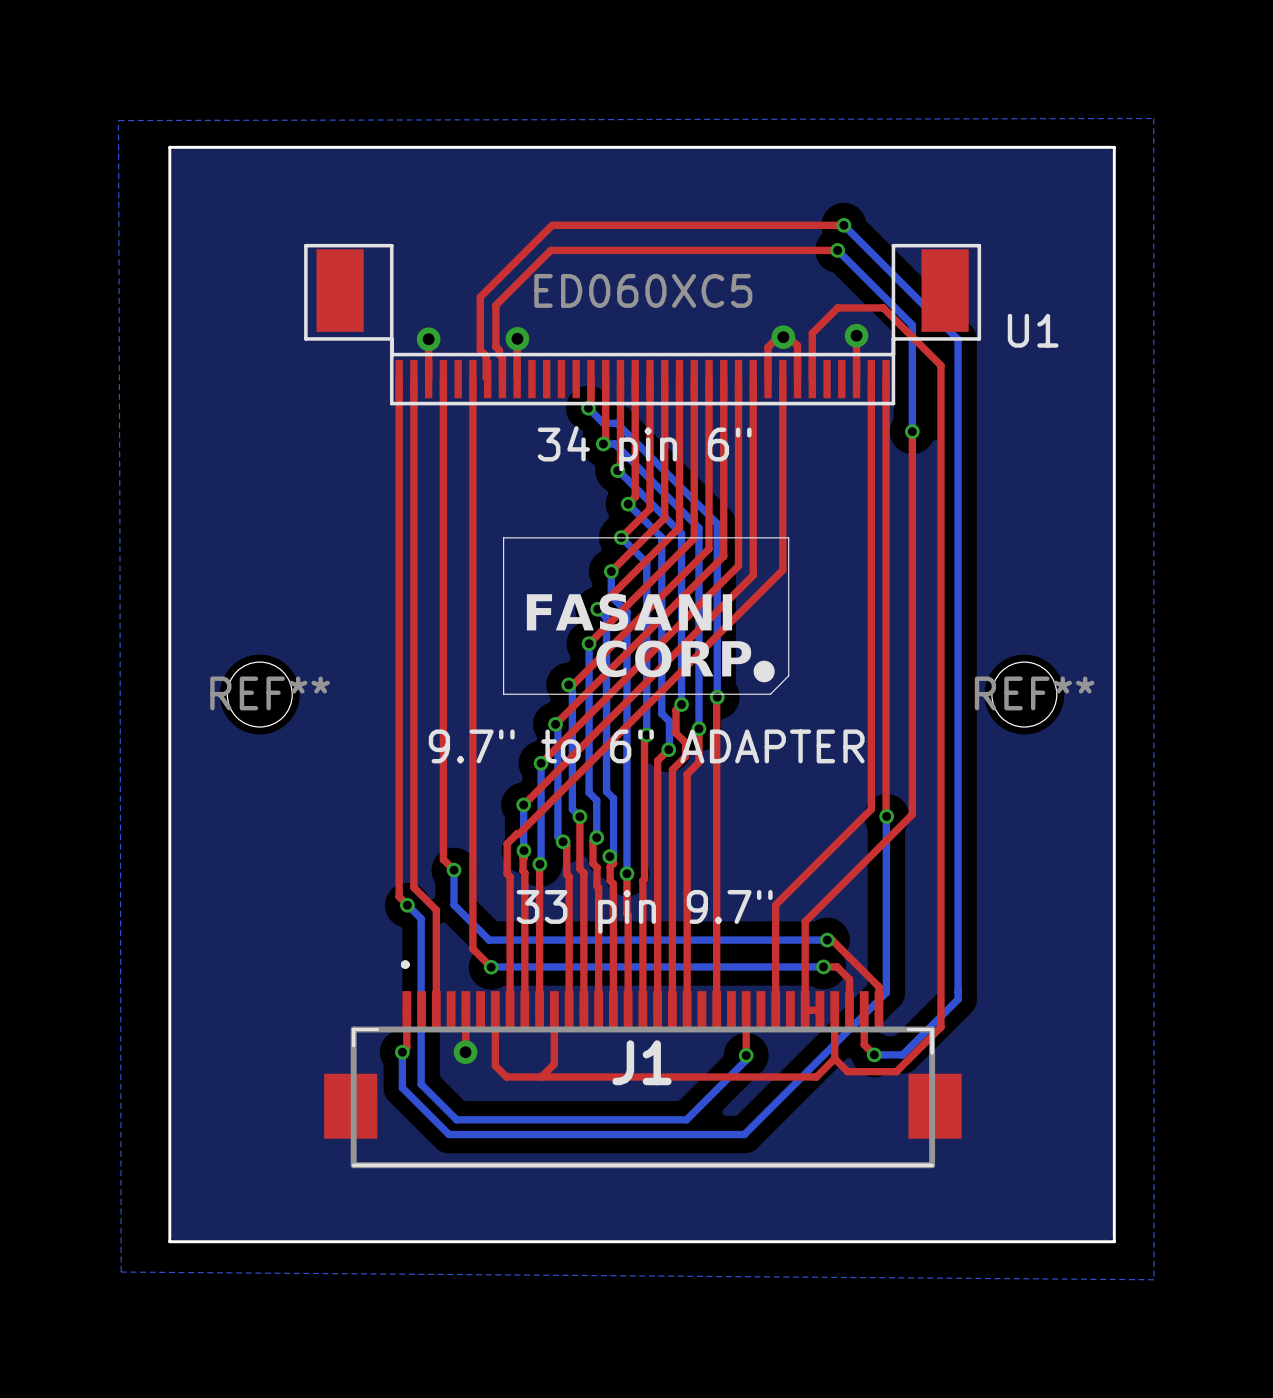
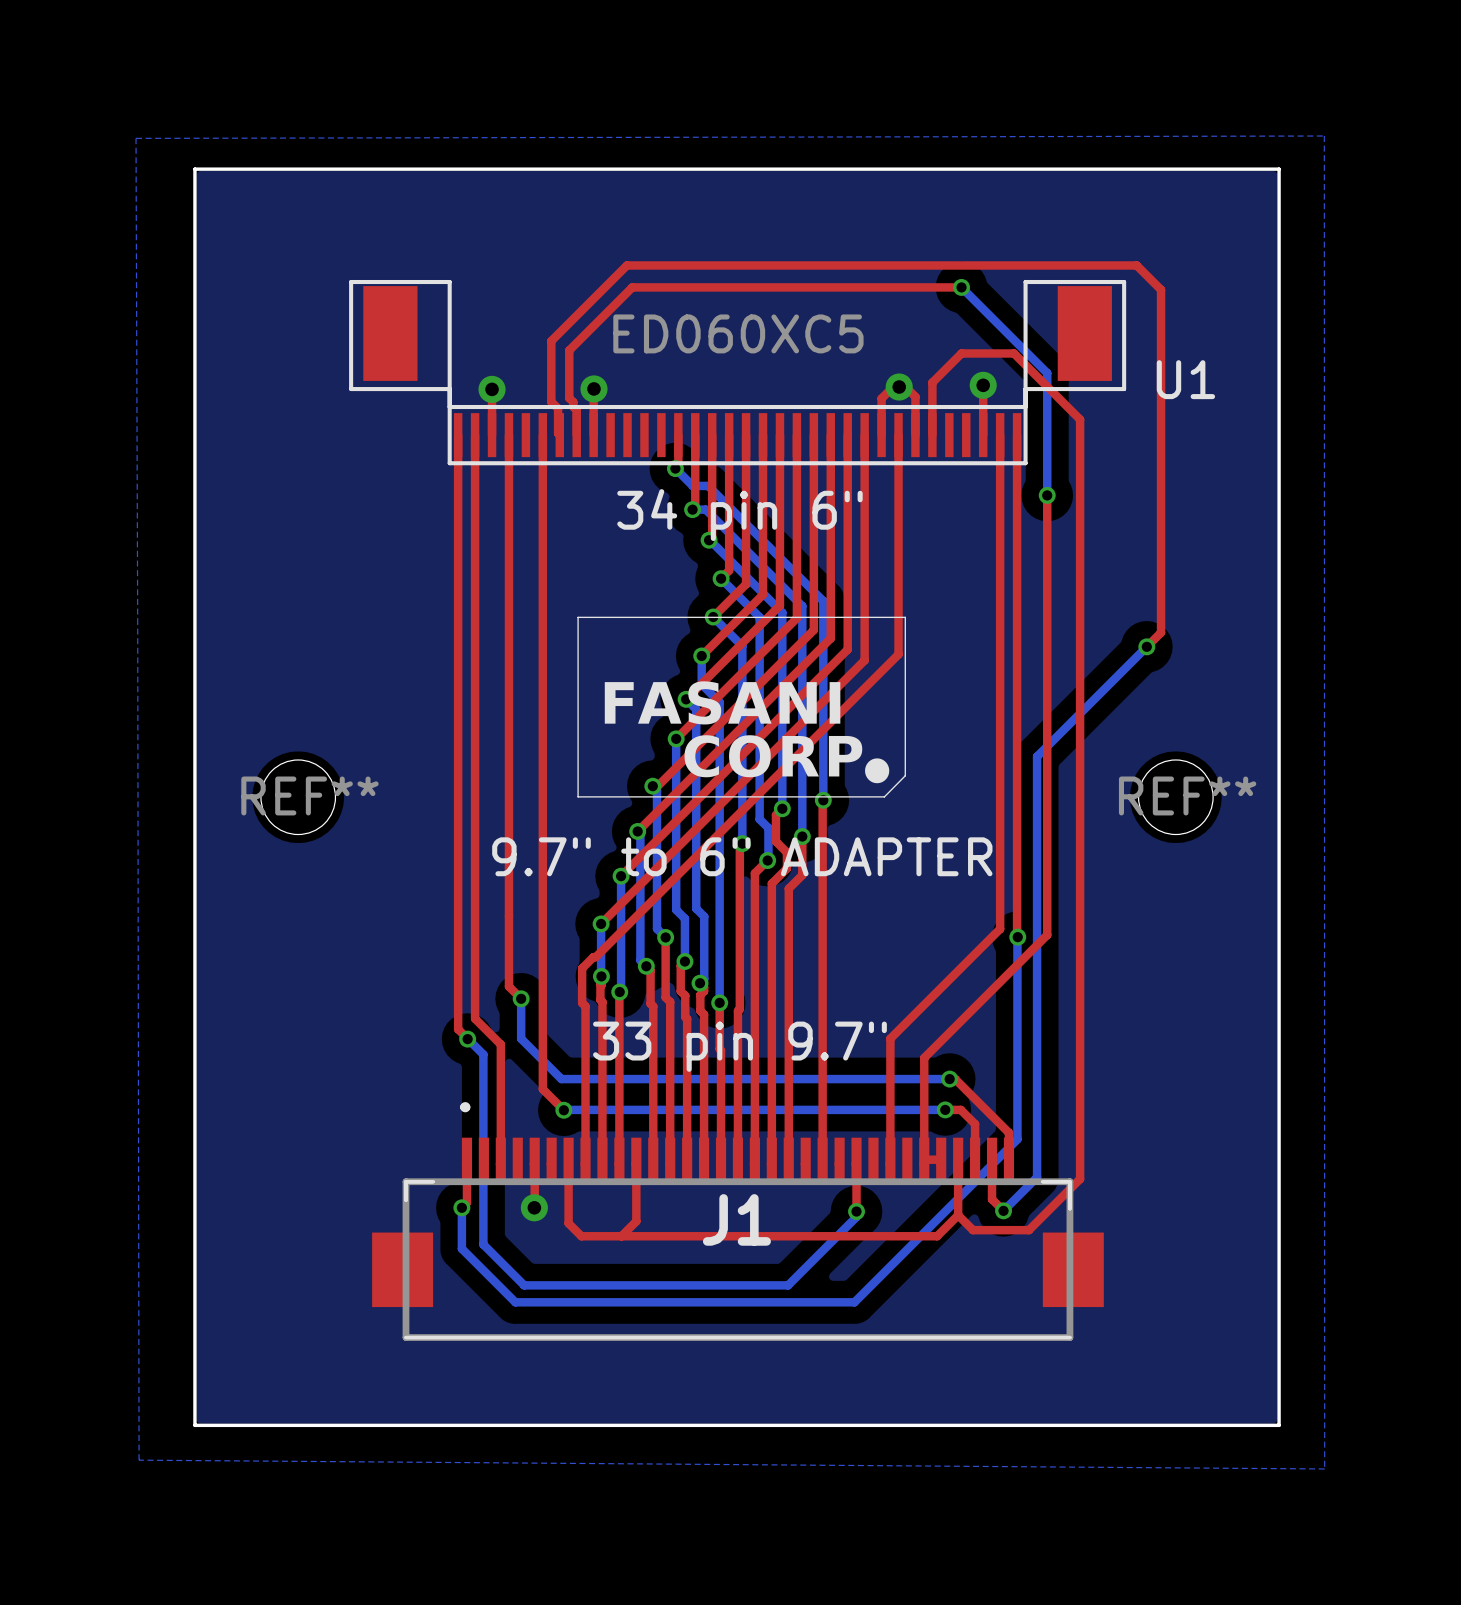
top track: (843, 225) (552, 225) (546, 231) -> (1146, 646) (1161, 632) (1161, 289) (1136, 265) (626, 265)
bottom track: (843, 225) (958, 339) (958, 999) (902, 1054) (874, 1054) -> (1146, 646) (1037, 756) (1037, 1177) (1003, 1210)
via: (843, 225) -> none
via: none -> (1146, 646)

